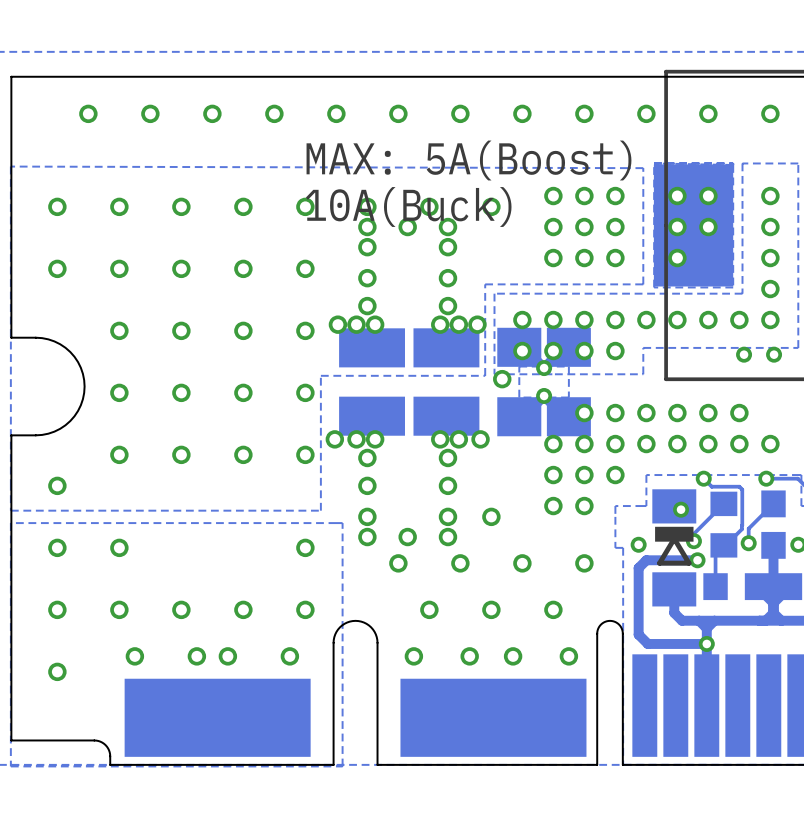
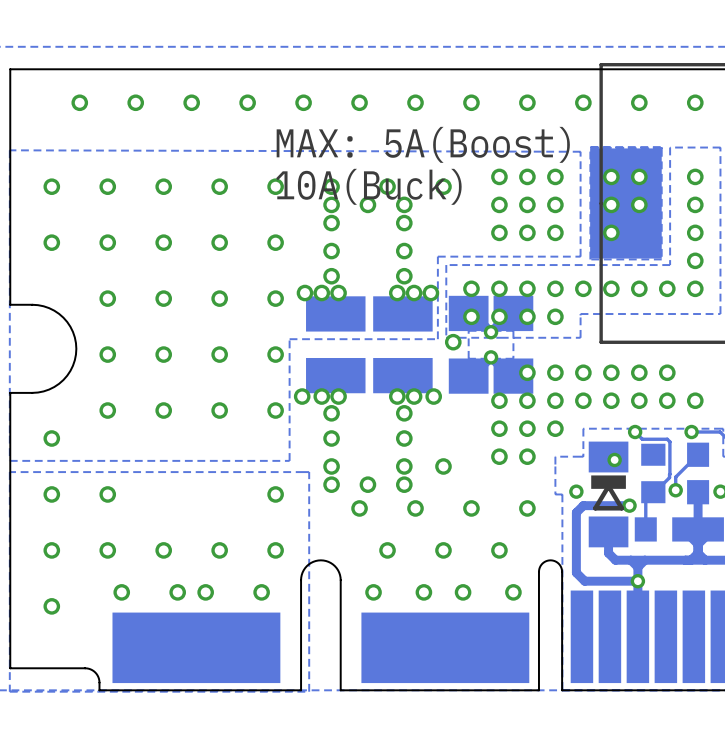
via: (744, 354) -> none
via: (774, 354) -> none
track: (723, 503) (693, 533) (693, 541) -> none
via: (693, 541) -> none

